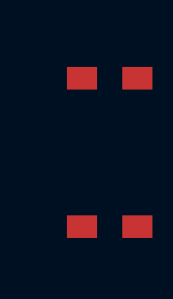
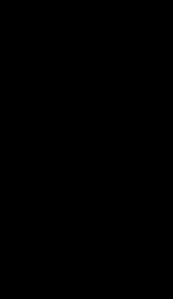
part: (109, 78) -> none
part: (109, 226) -> none

